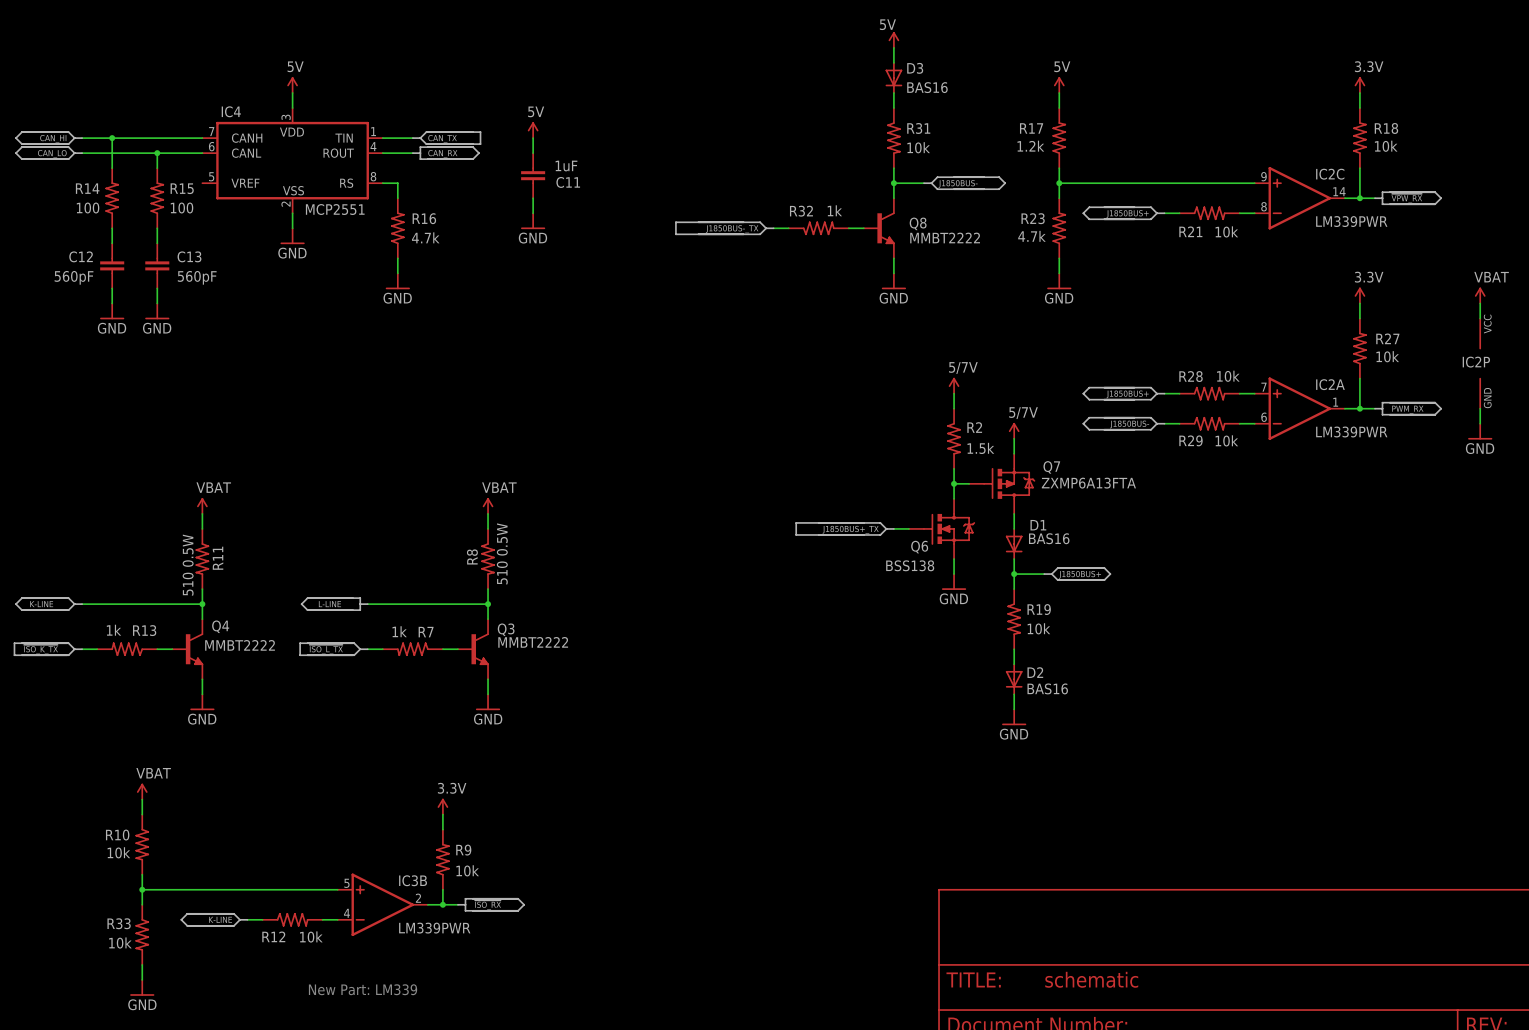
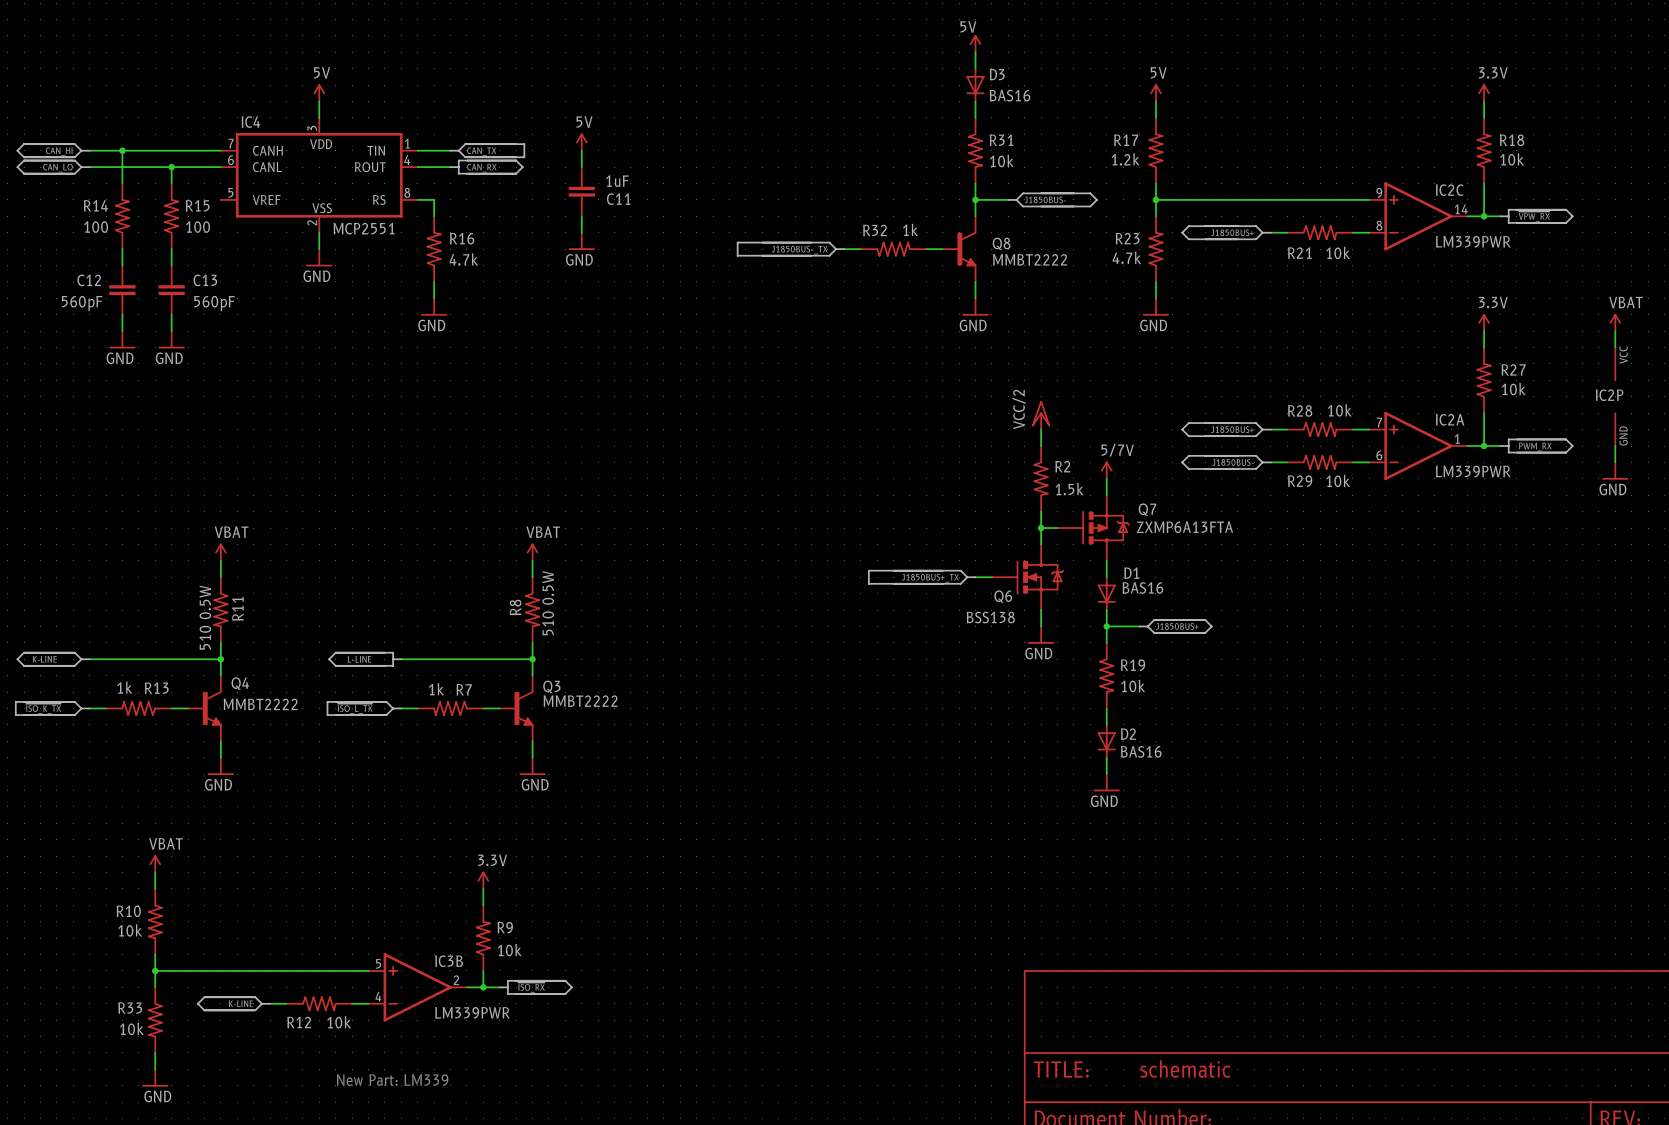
power symbol: 5/7V (954, 385) -> VCC/2 (1041, 415)

